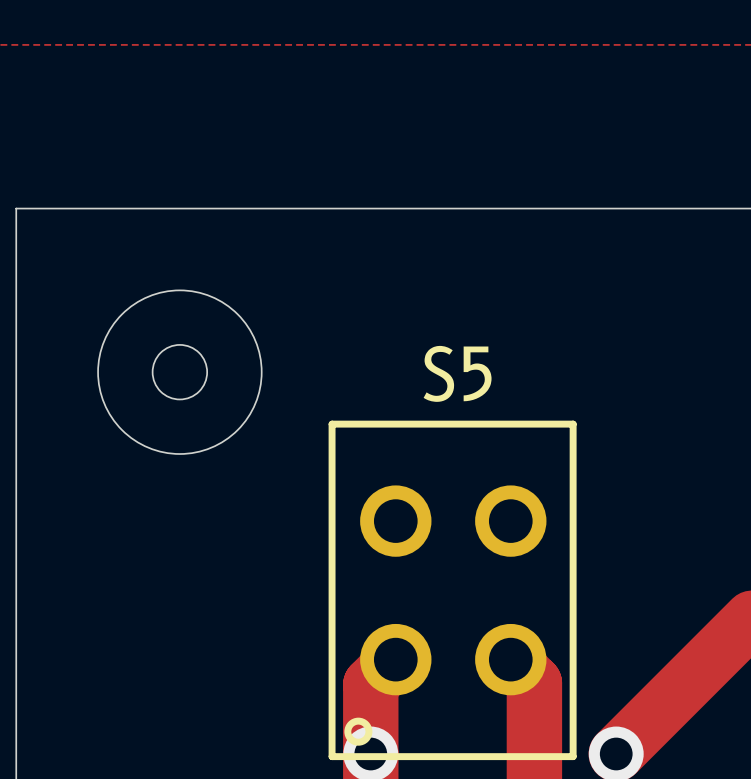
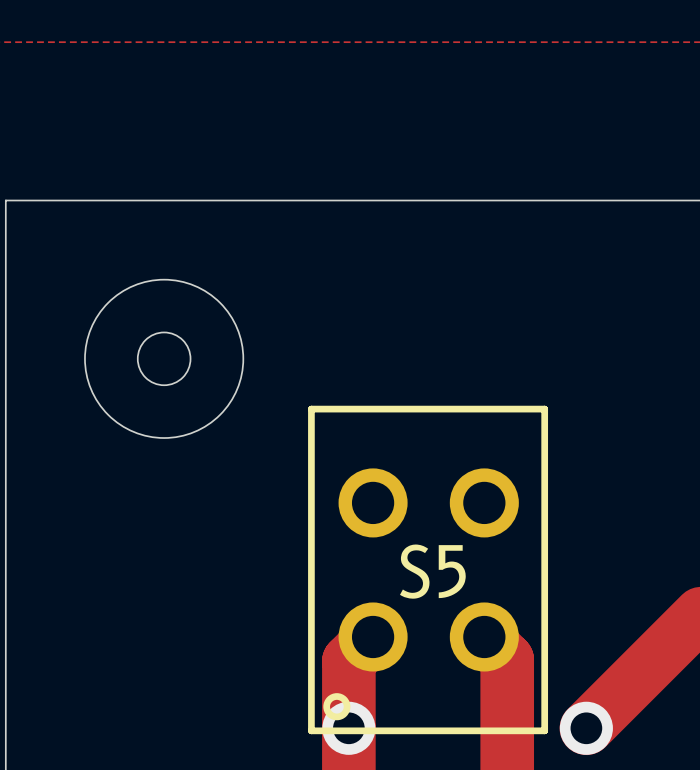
S5 name position: S5 (457, 373) -> S5 (432, 571)

